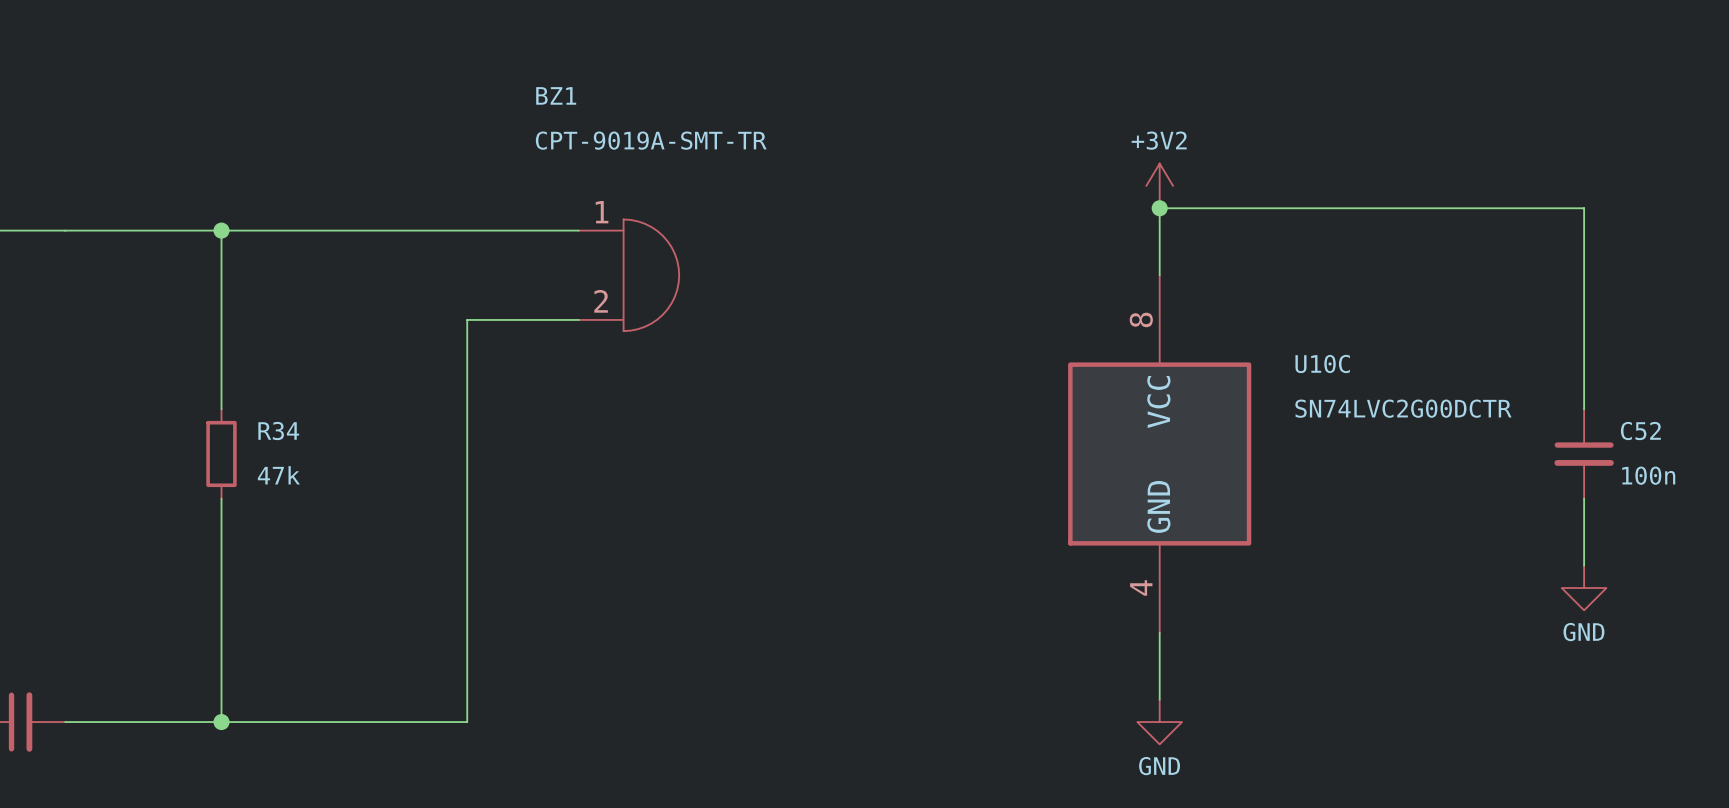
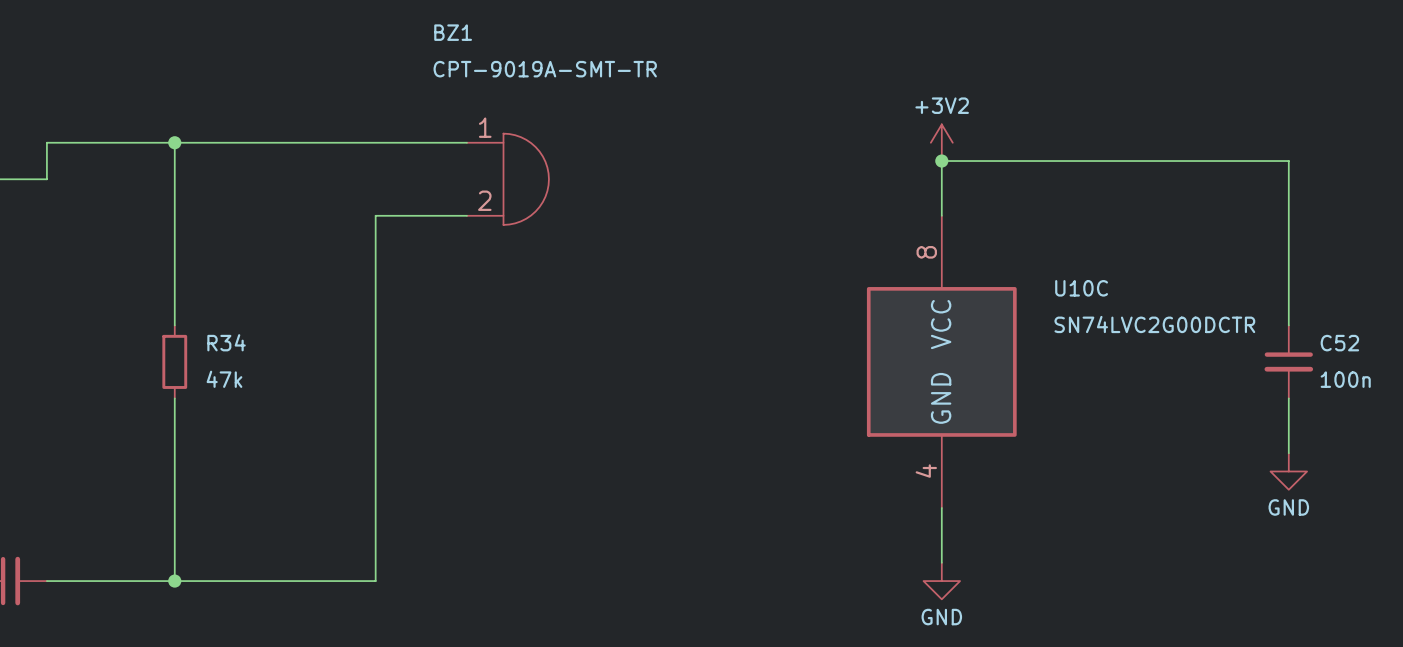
wire: none -> (174, 142) (174, 179)
wire: (65, 230) (578, 230) -> (46, 179) (46, 142) (466, 142)
junction position: (221, 230) -> (174, 142)
BZ1 position: (629, 275) -> (507, 179)
wire: (467, 319) (578, 319) -> (375, 252) (375, 215) (466, 215)

